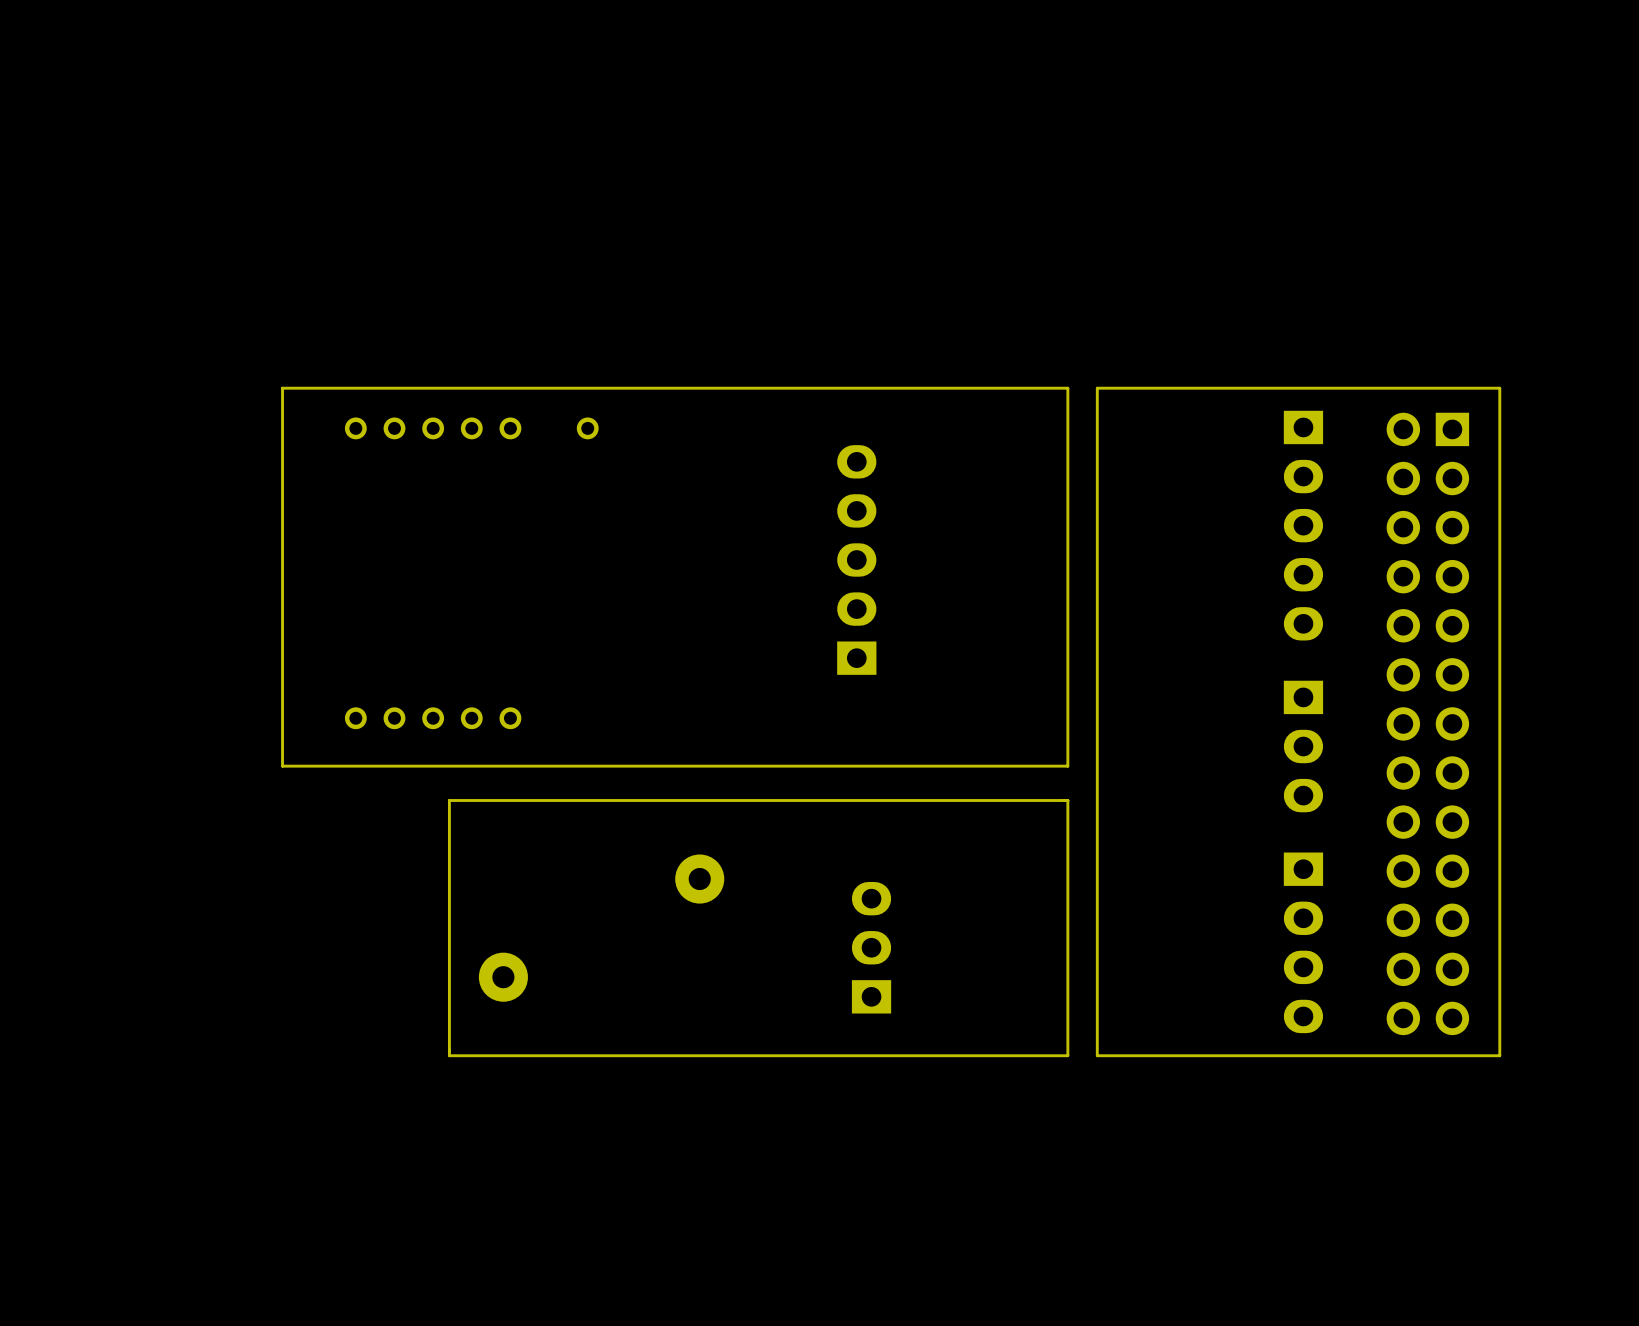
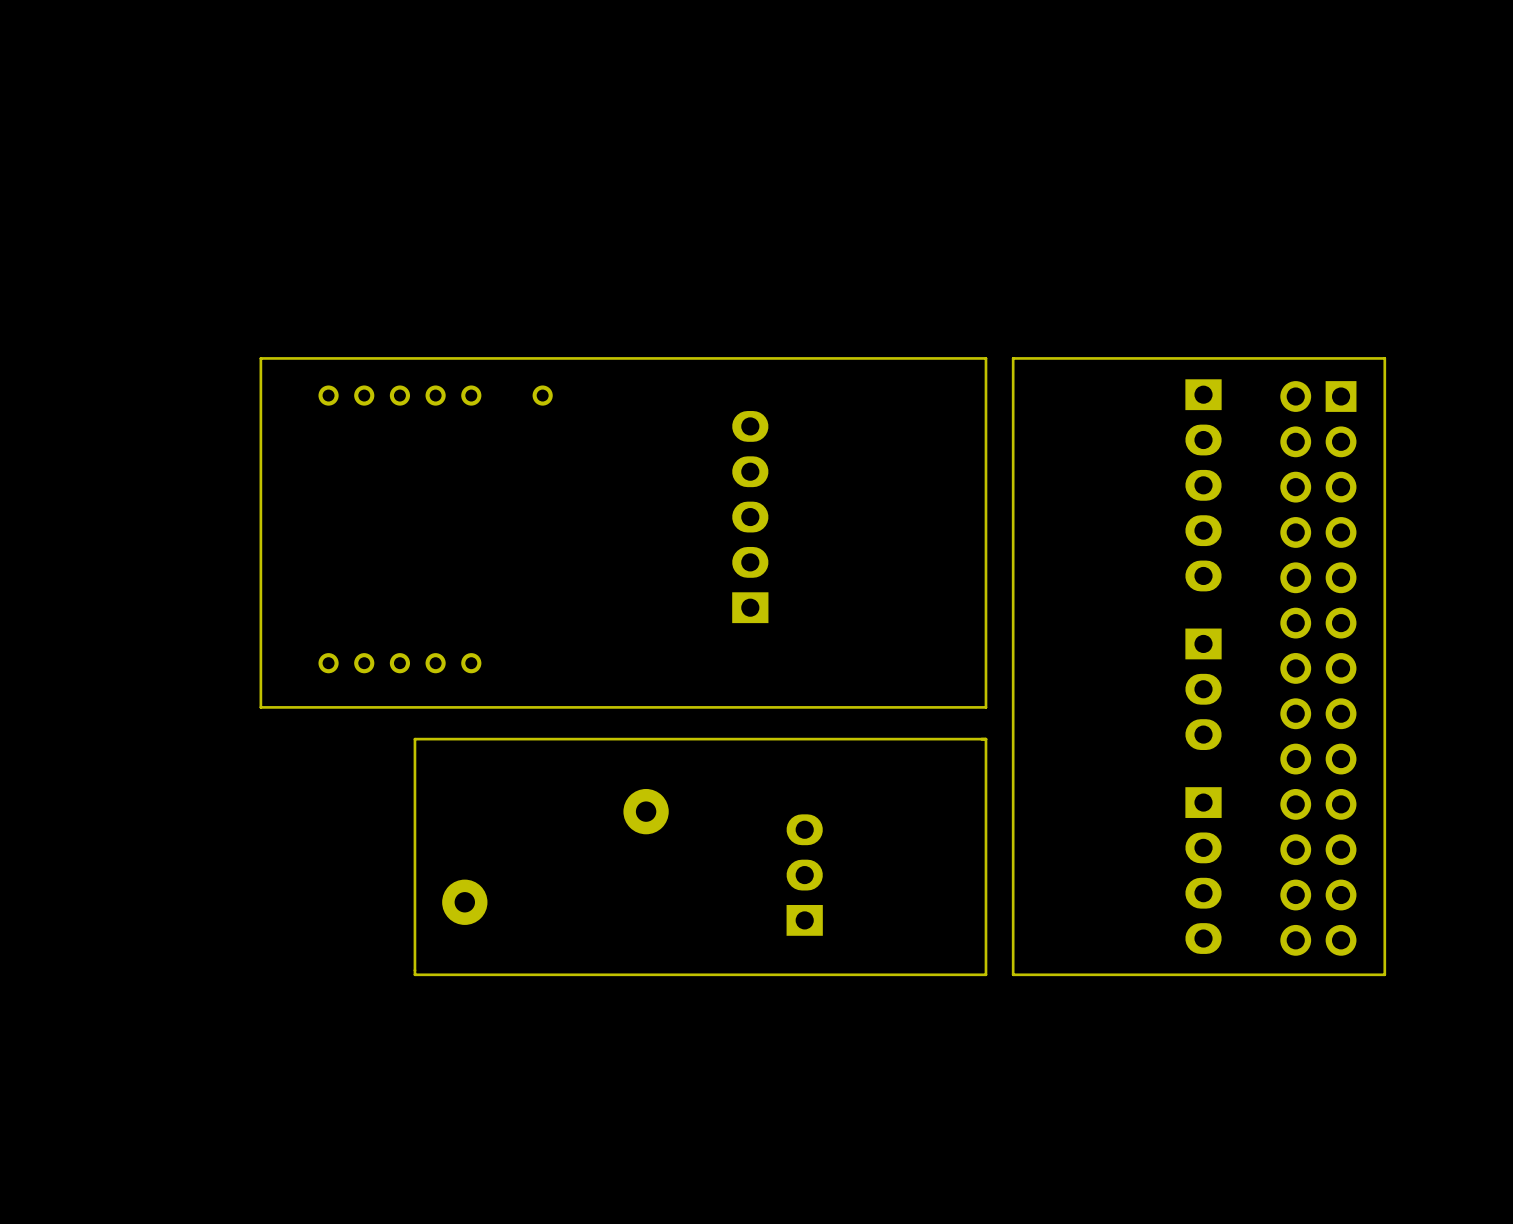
part position: (856, 559) -> (750, 517)

